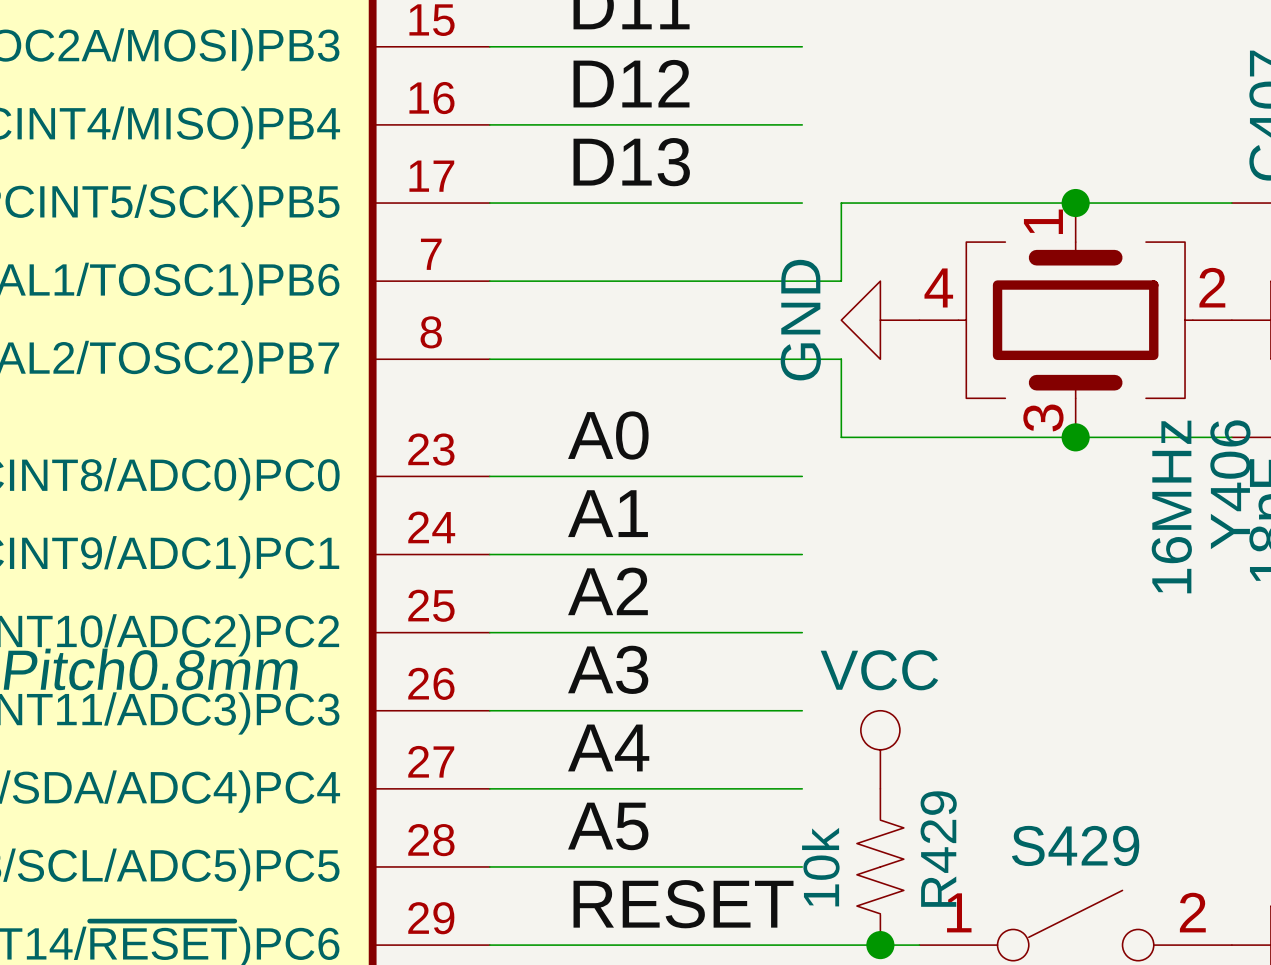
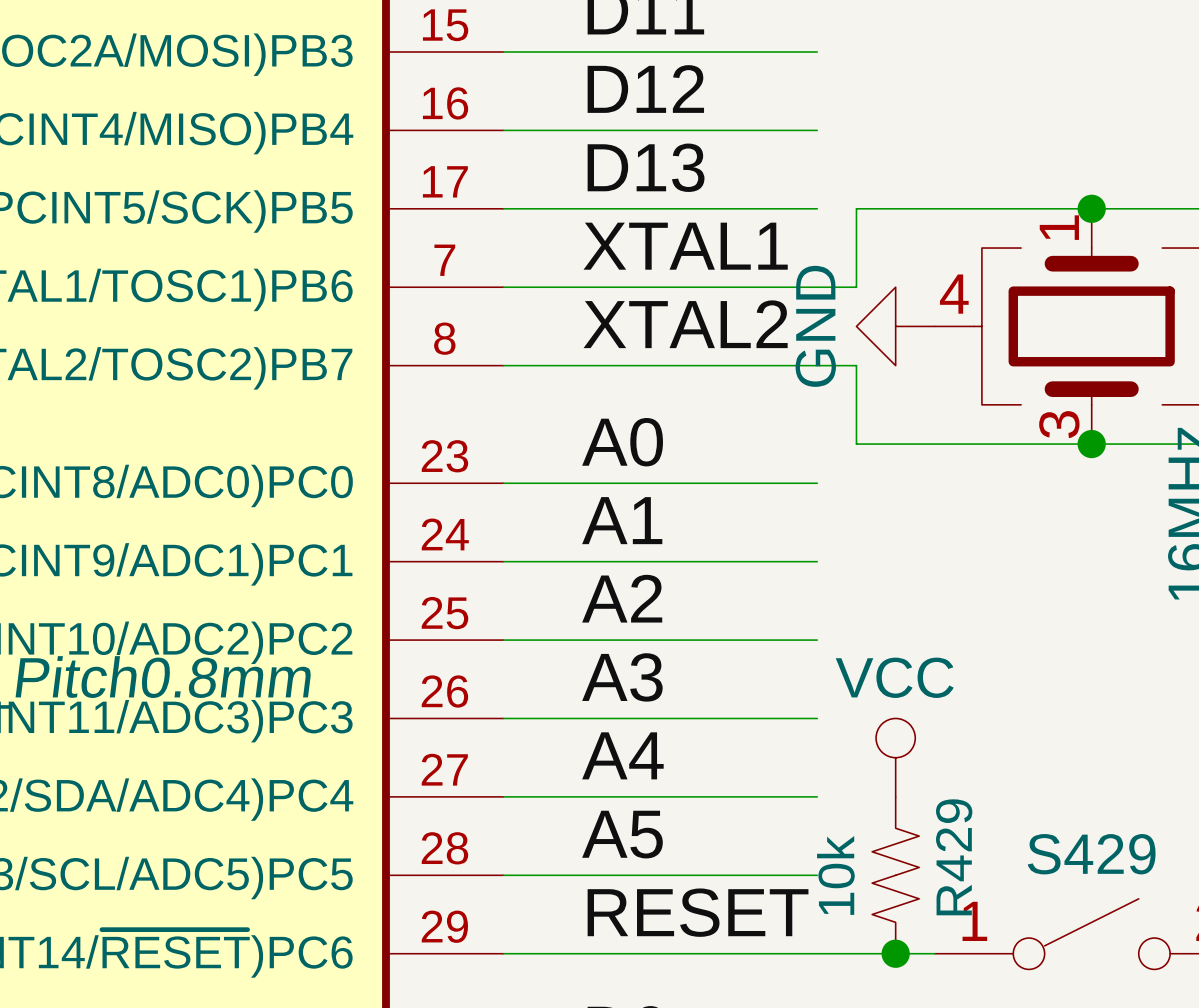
label: none -> XTAL1 (685, 246)
label: none -> XTAL2 (685, 324)

